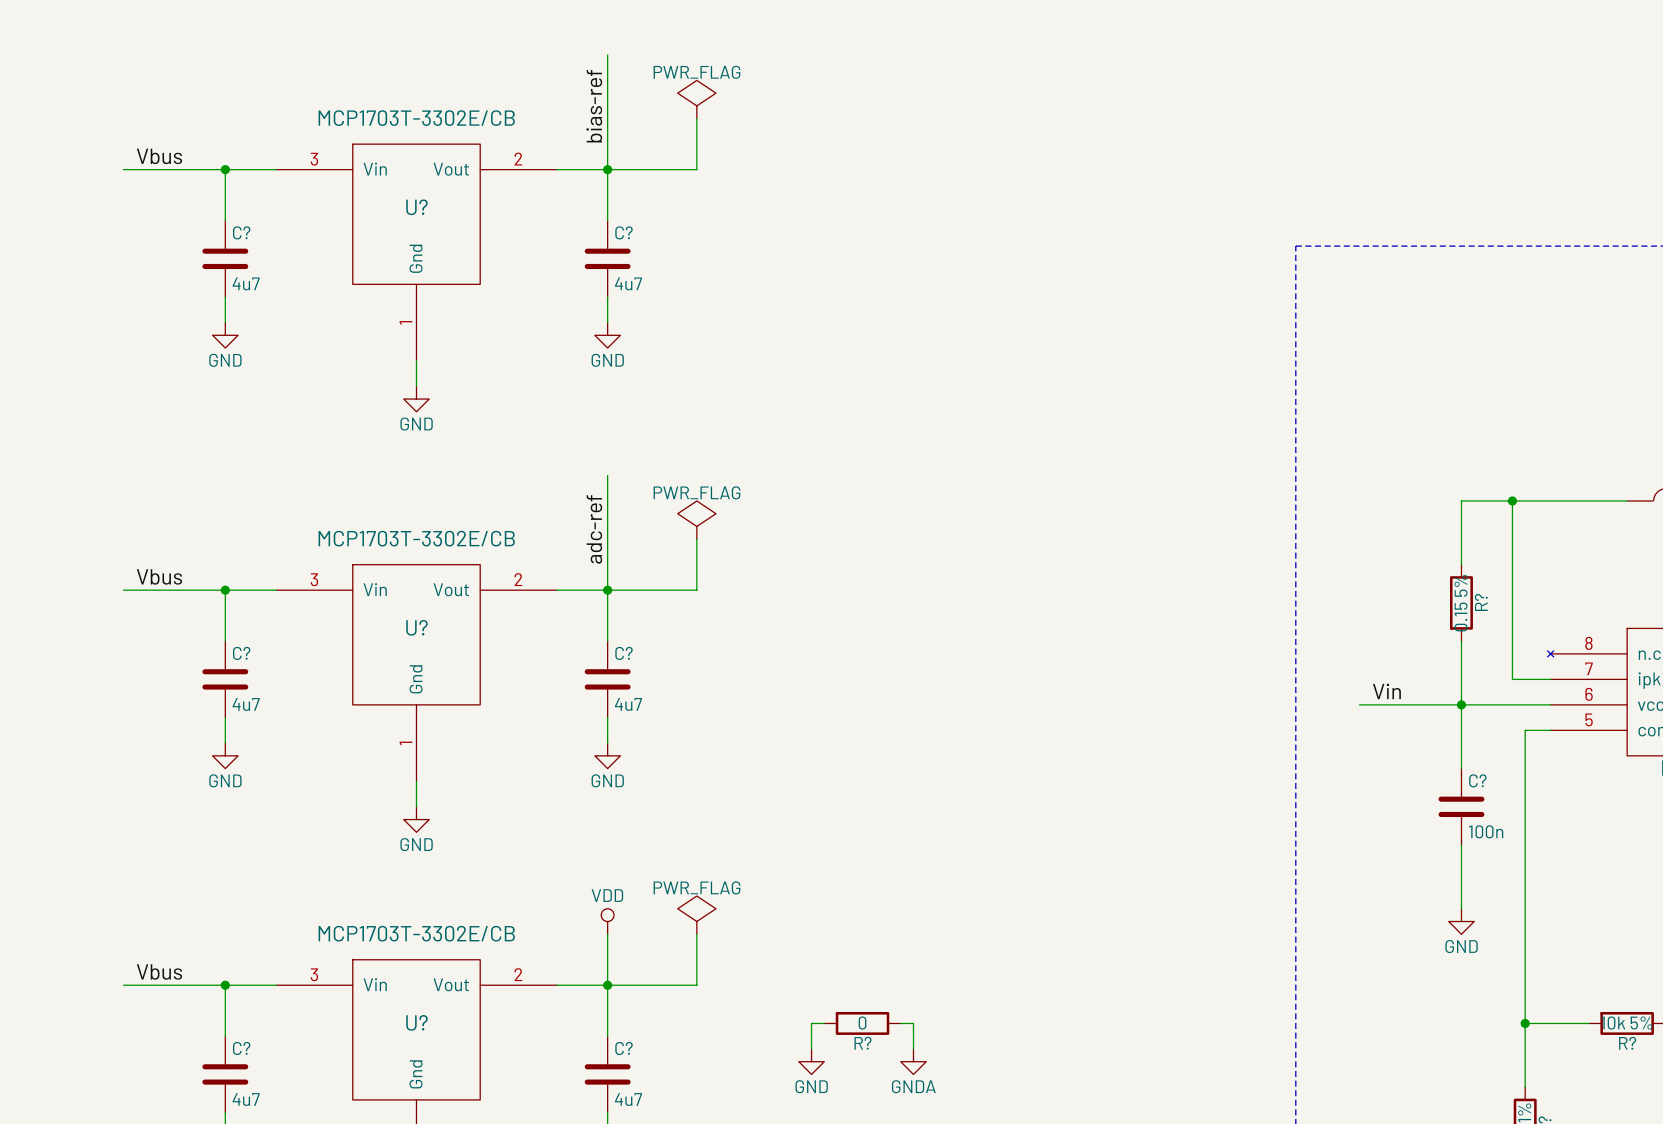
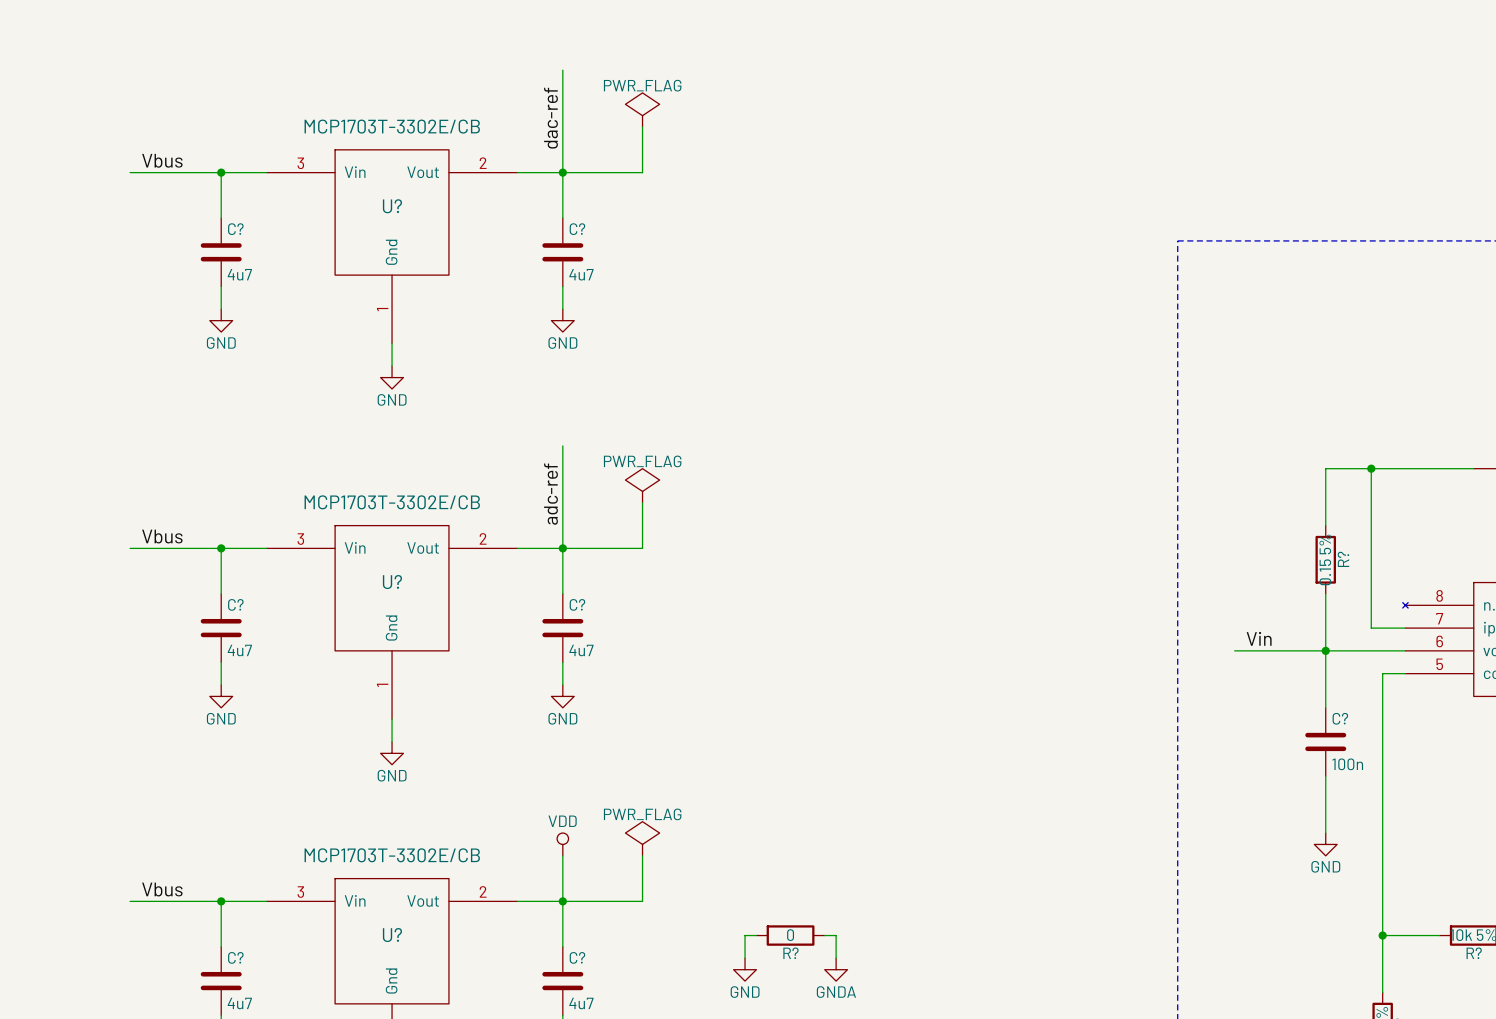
label: bias-ref (594, 106) -> dac-ref (550, 118)

